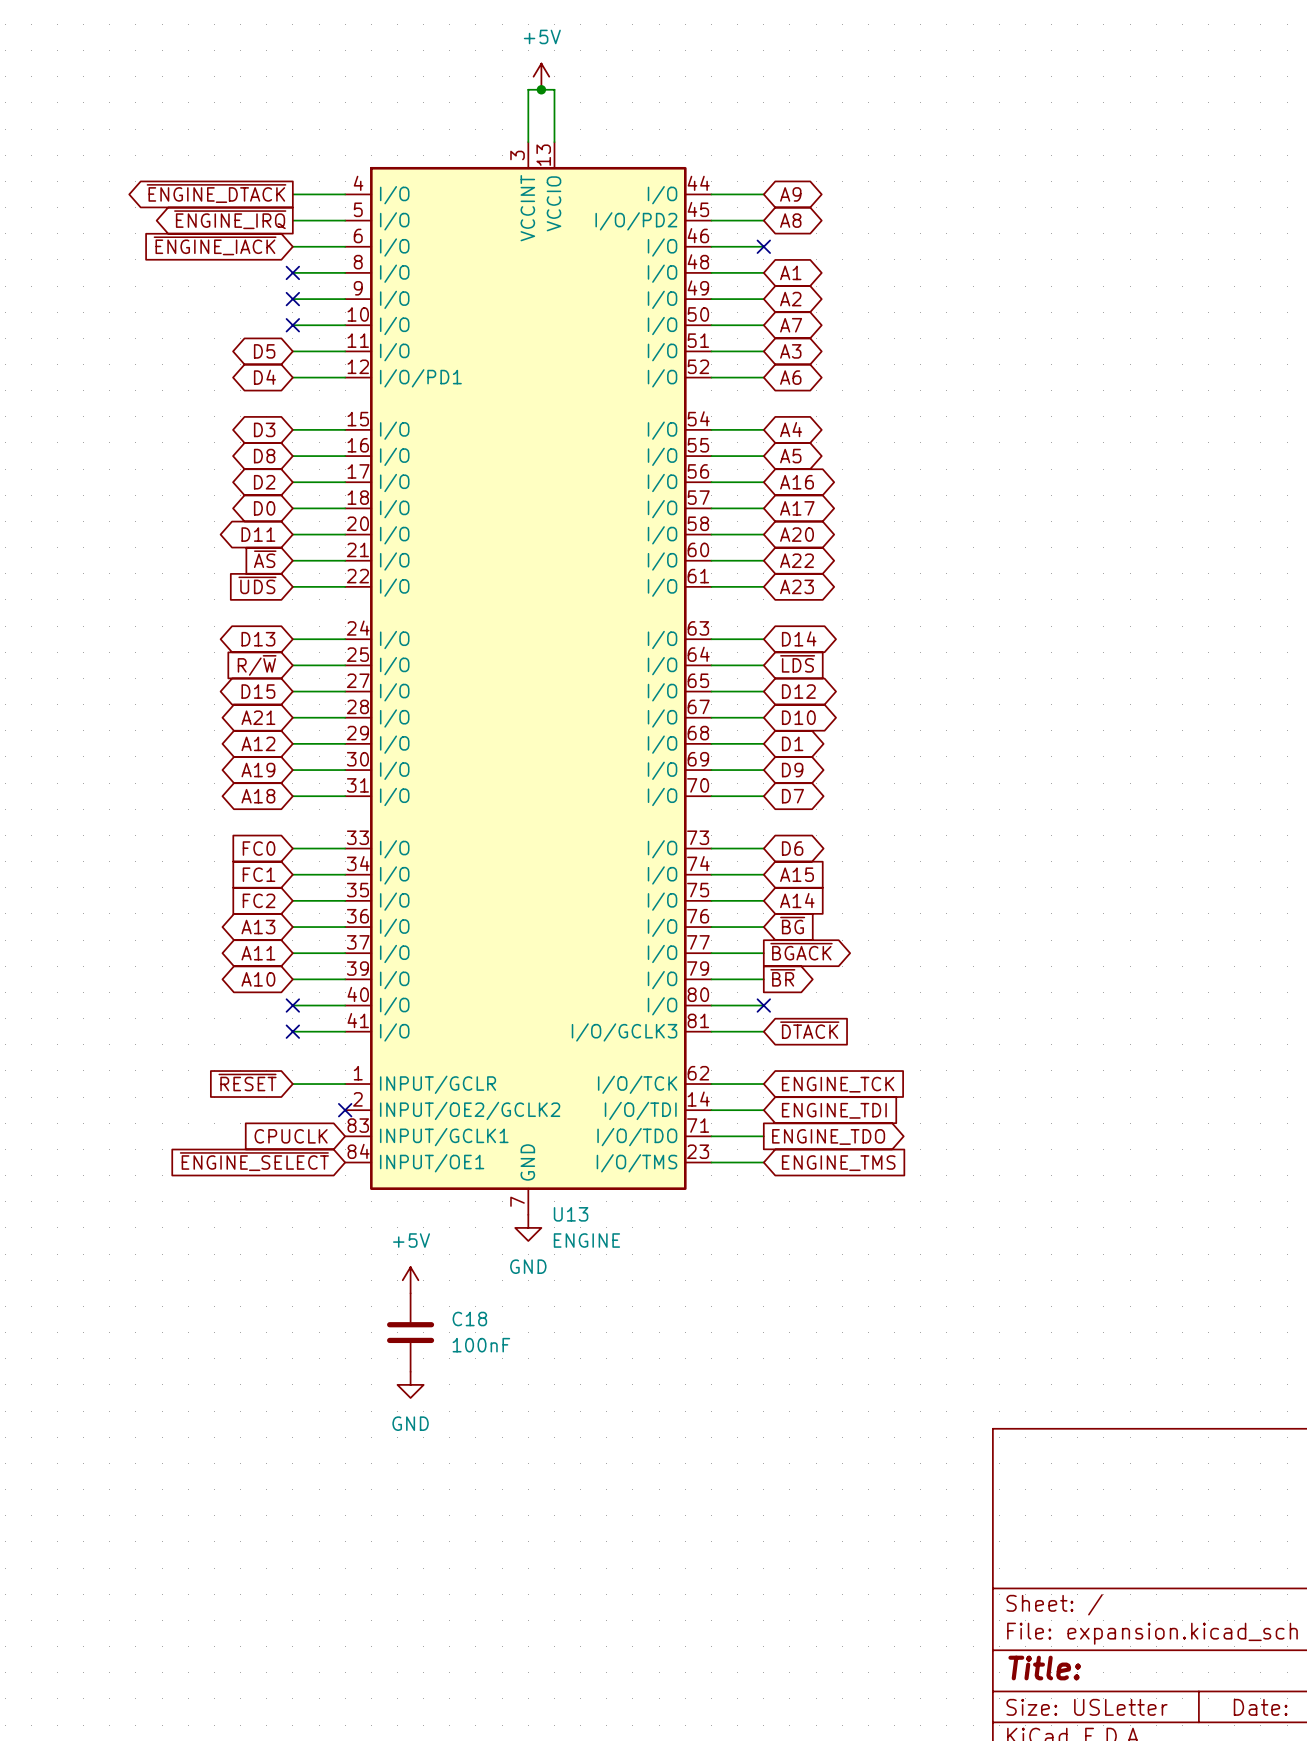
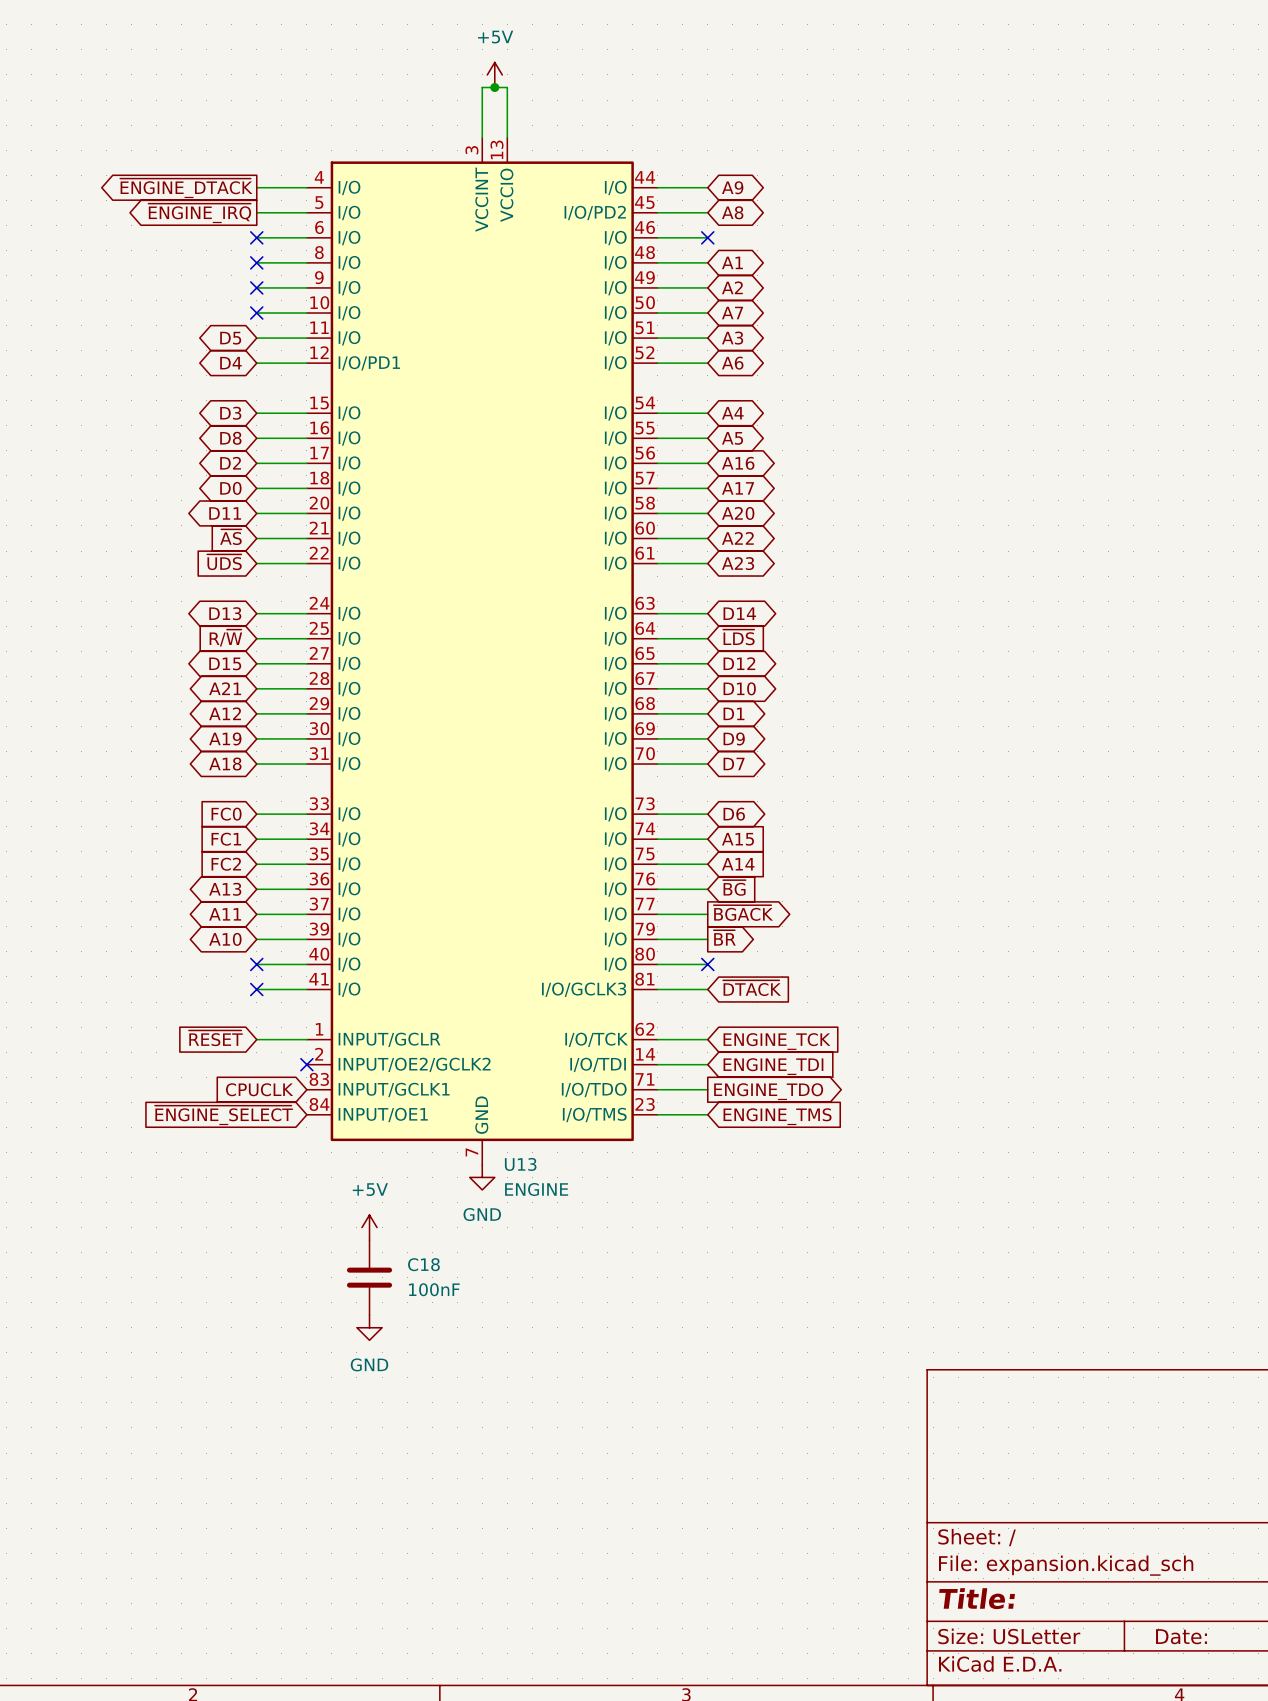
global label: ~{ENGINE_IACK} (215, 245) -> none
no-connect mark: none -> (256, 237)

